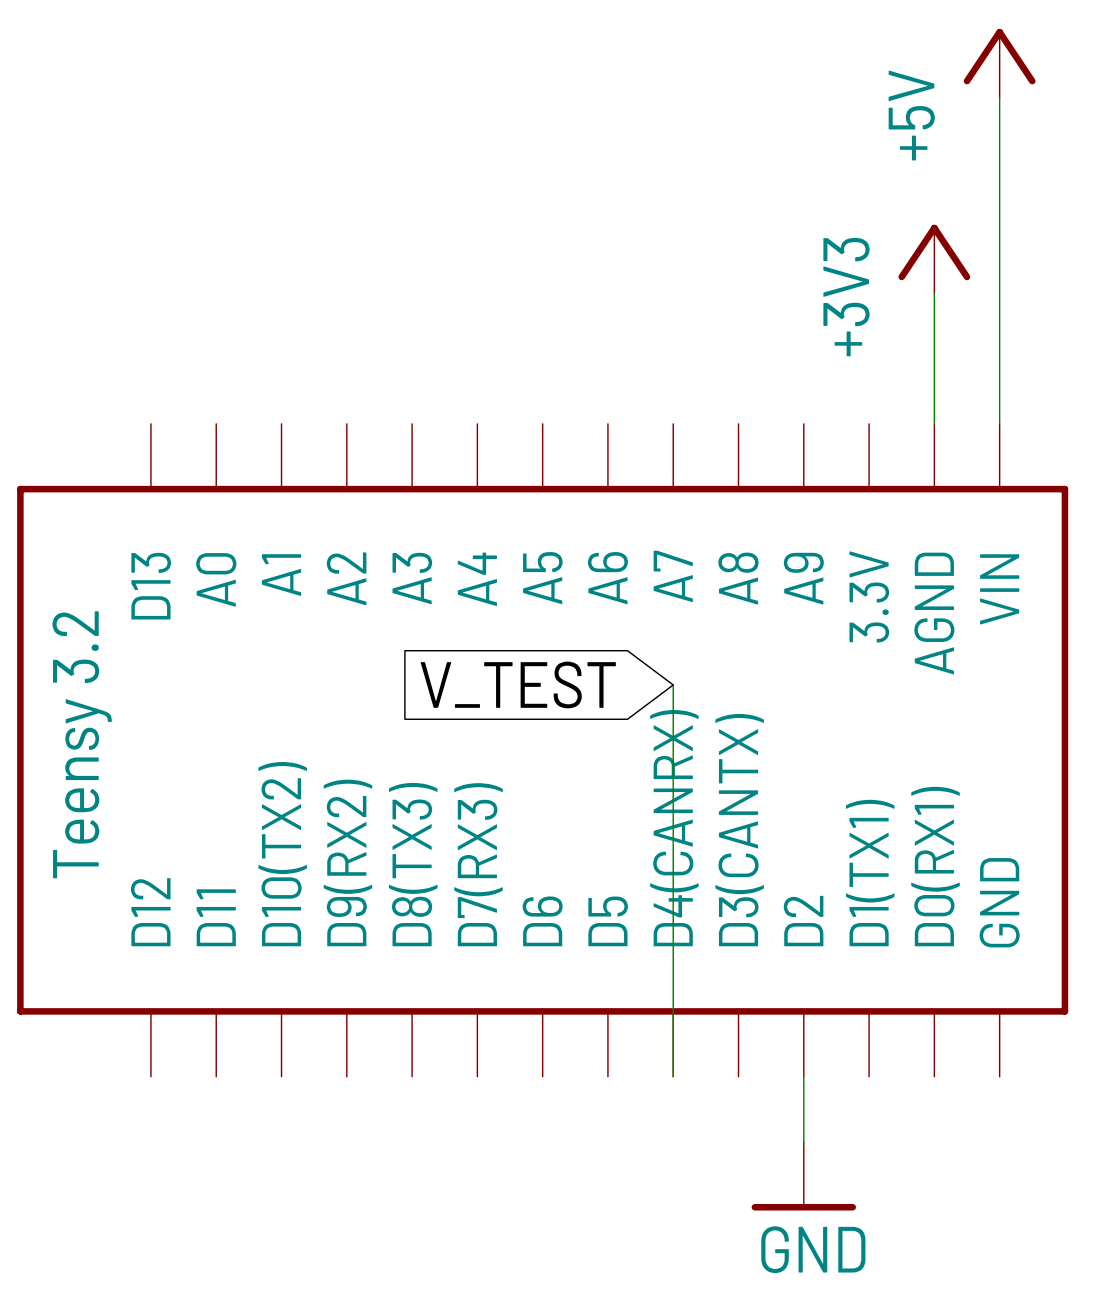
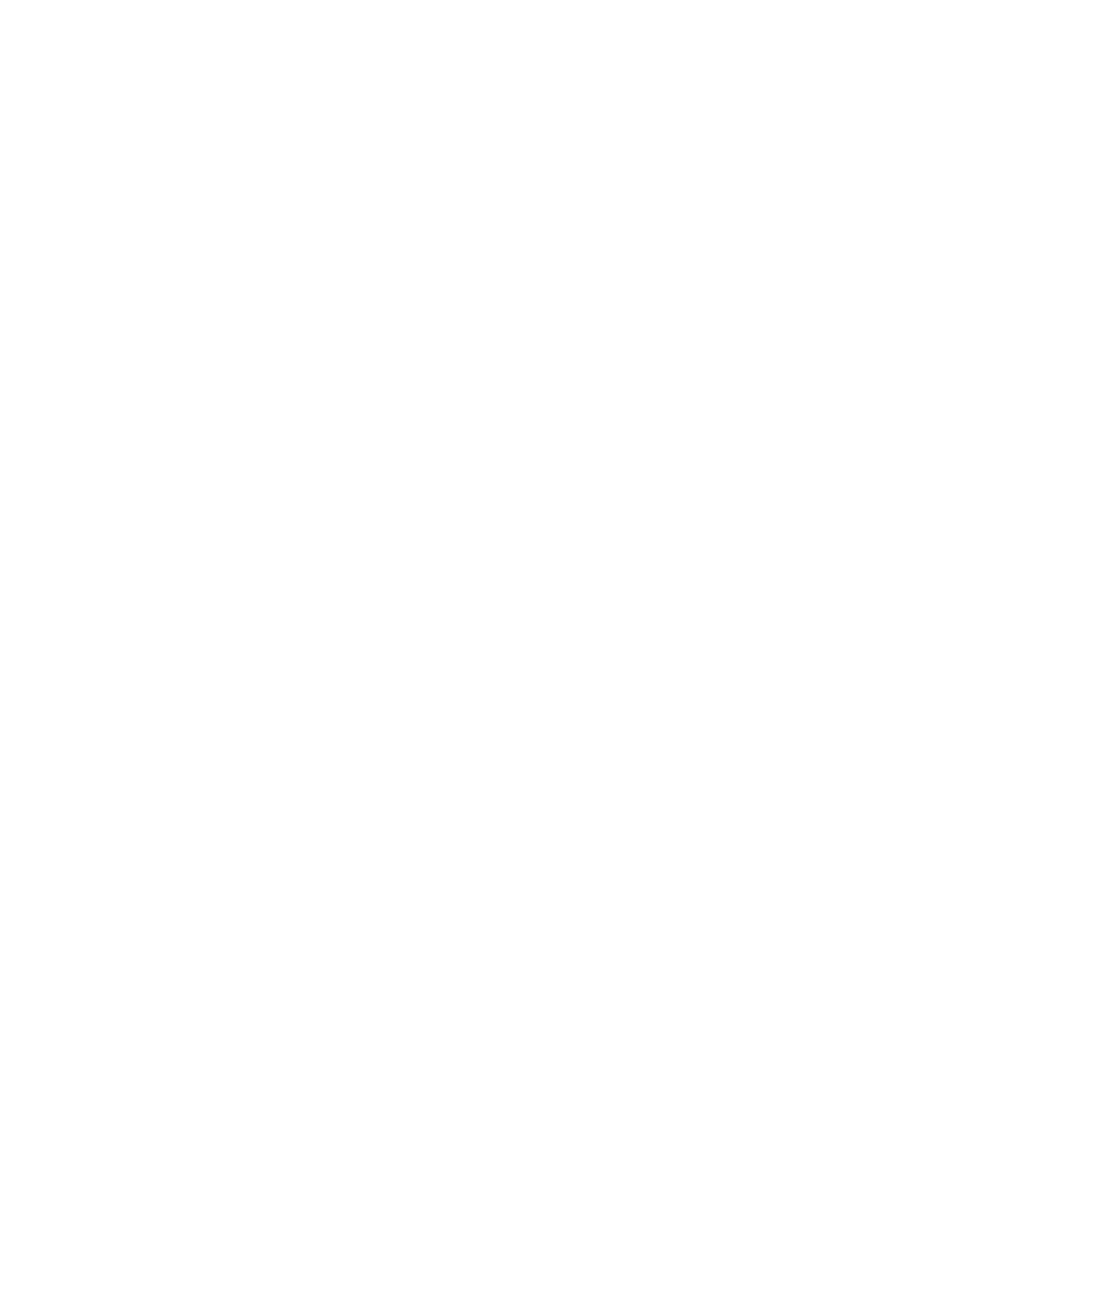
power symbol: +5V (999, 63) -> none
wire: (999, 97) (999, 423) -> none
power symbol: +3V3 (934, 259) -> none
wire: (934, 293) (934, 423) -> none
global label: V_TEST (518, 684) -> none
wire: (673, 684) (673, 1076) -> none
part: (542, 750) -> none
wire: (803, 1076) (803, 1141) -> none
power symbol: GND (803, 1176) -> none

